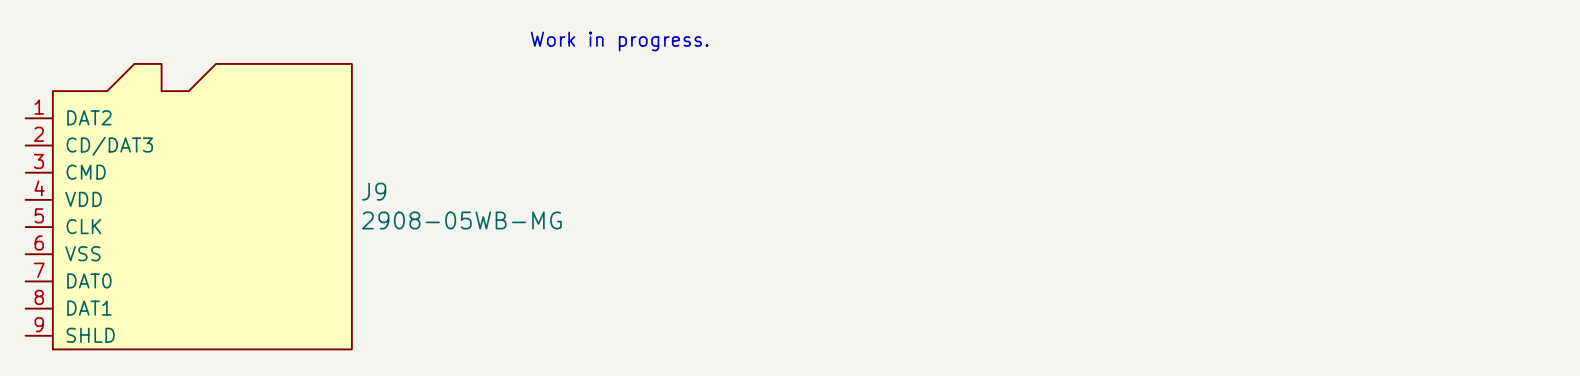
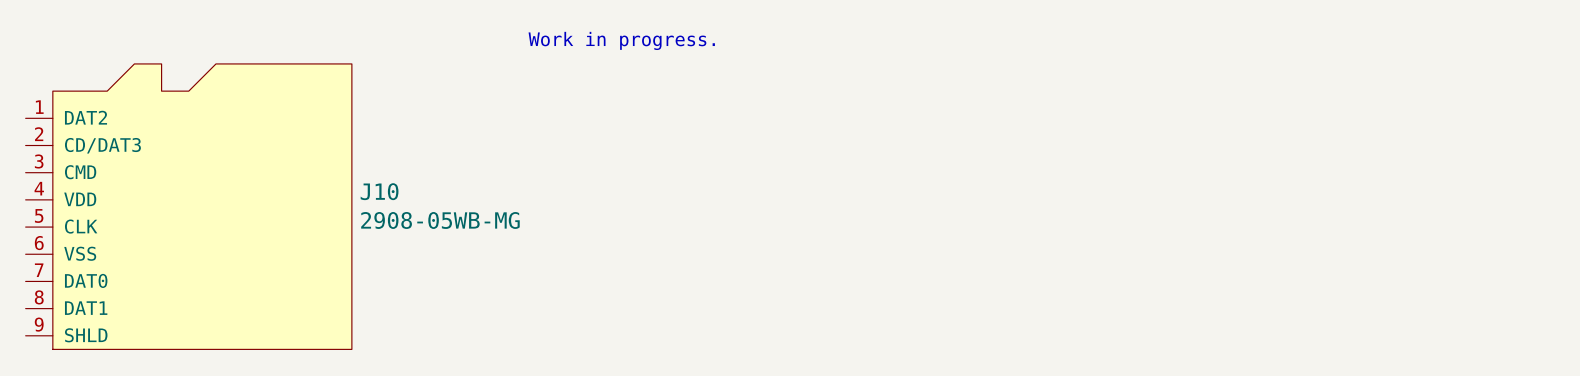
J9 name: J9 (374, 191) -> J10 (379, 191)

